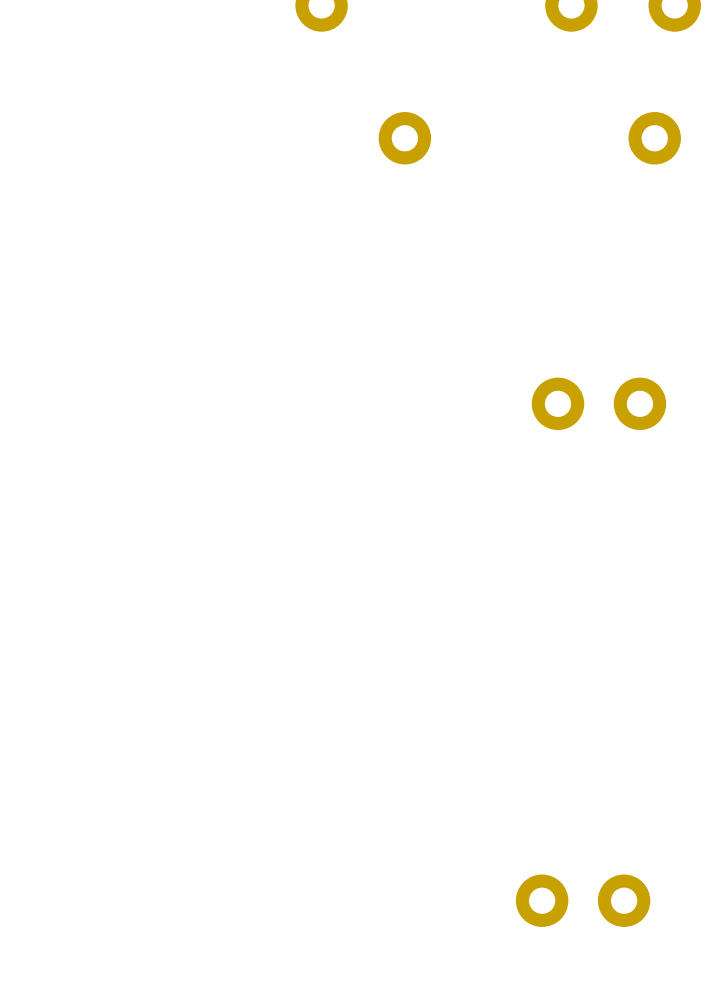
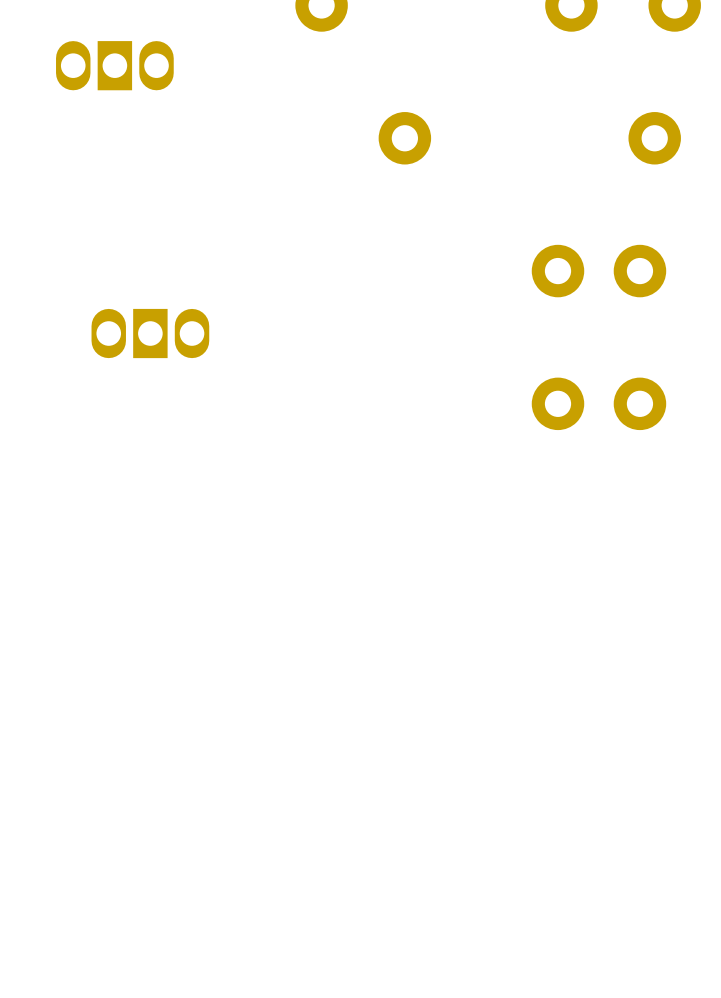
part: none -> (114, 65)
part: none -> (150, 333)
part position: (583, 900) -> (598, 271)

